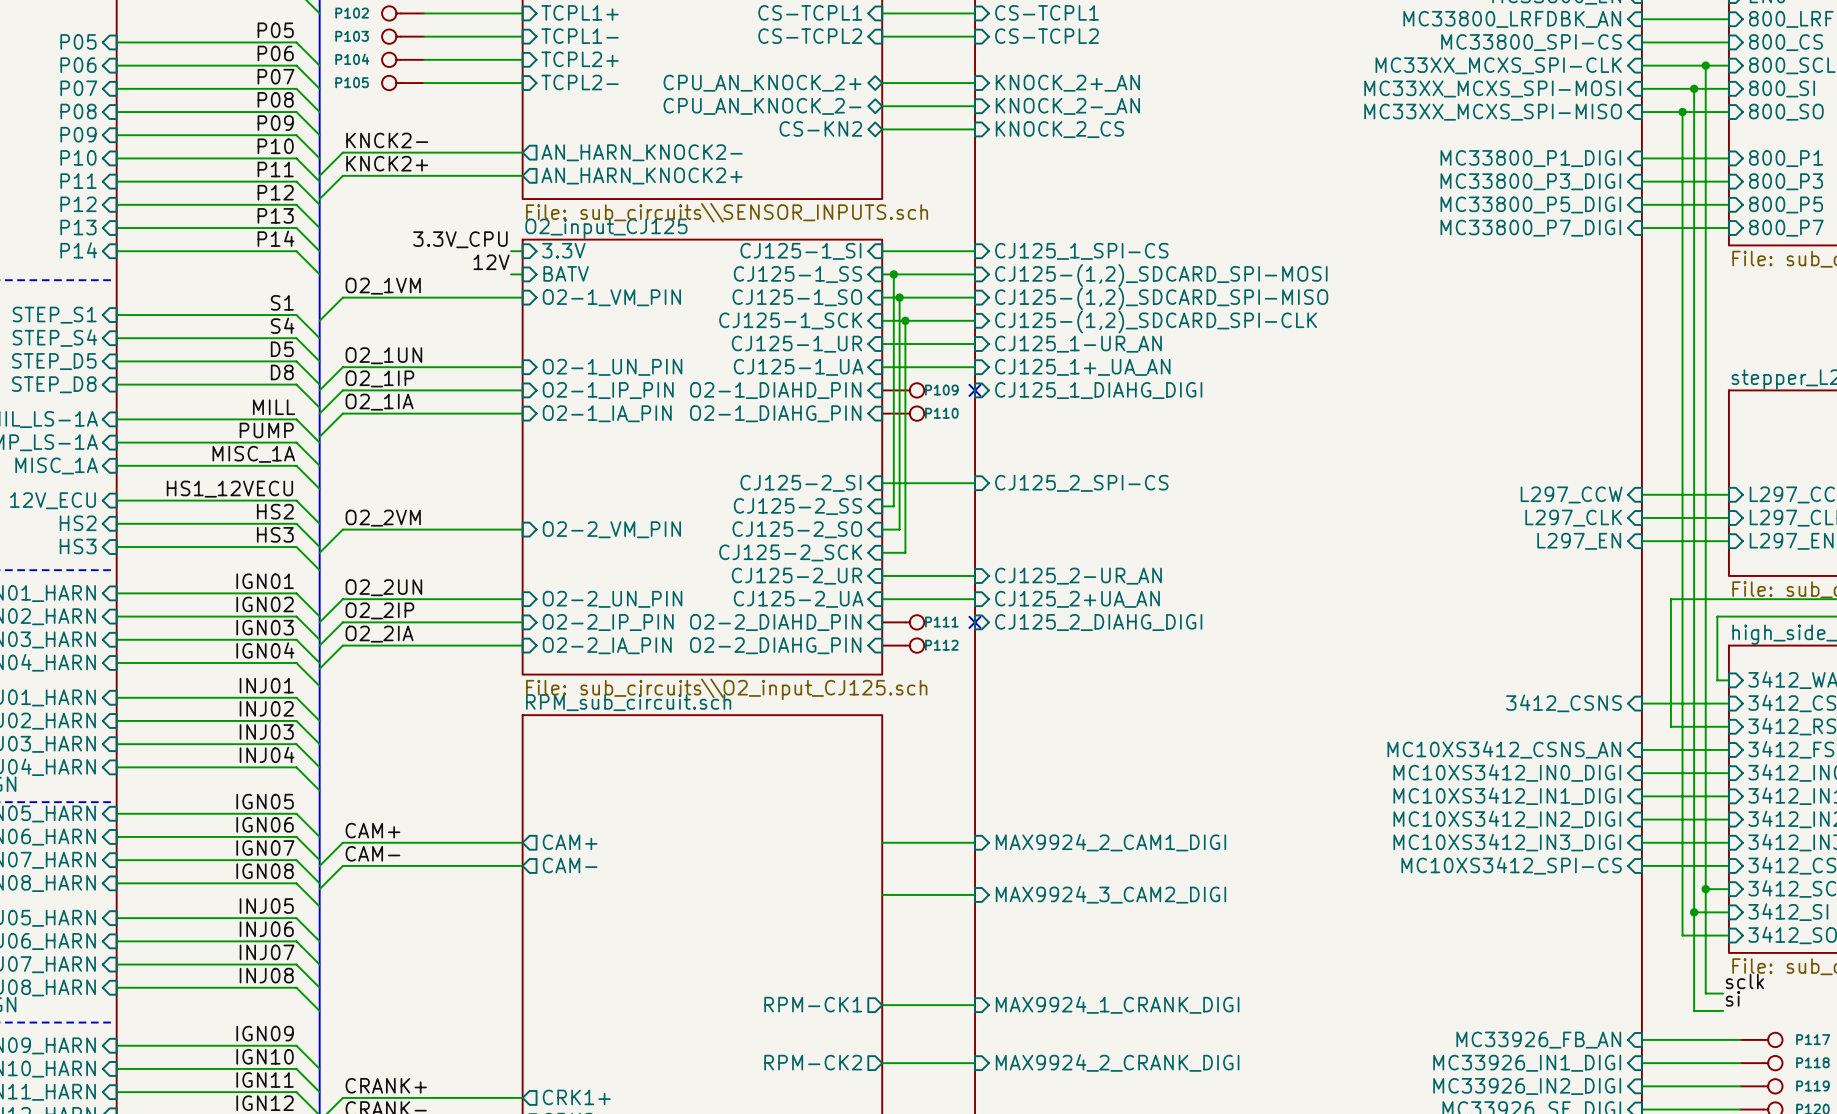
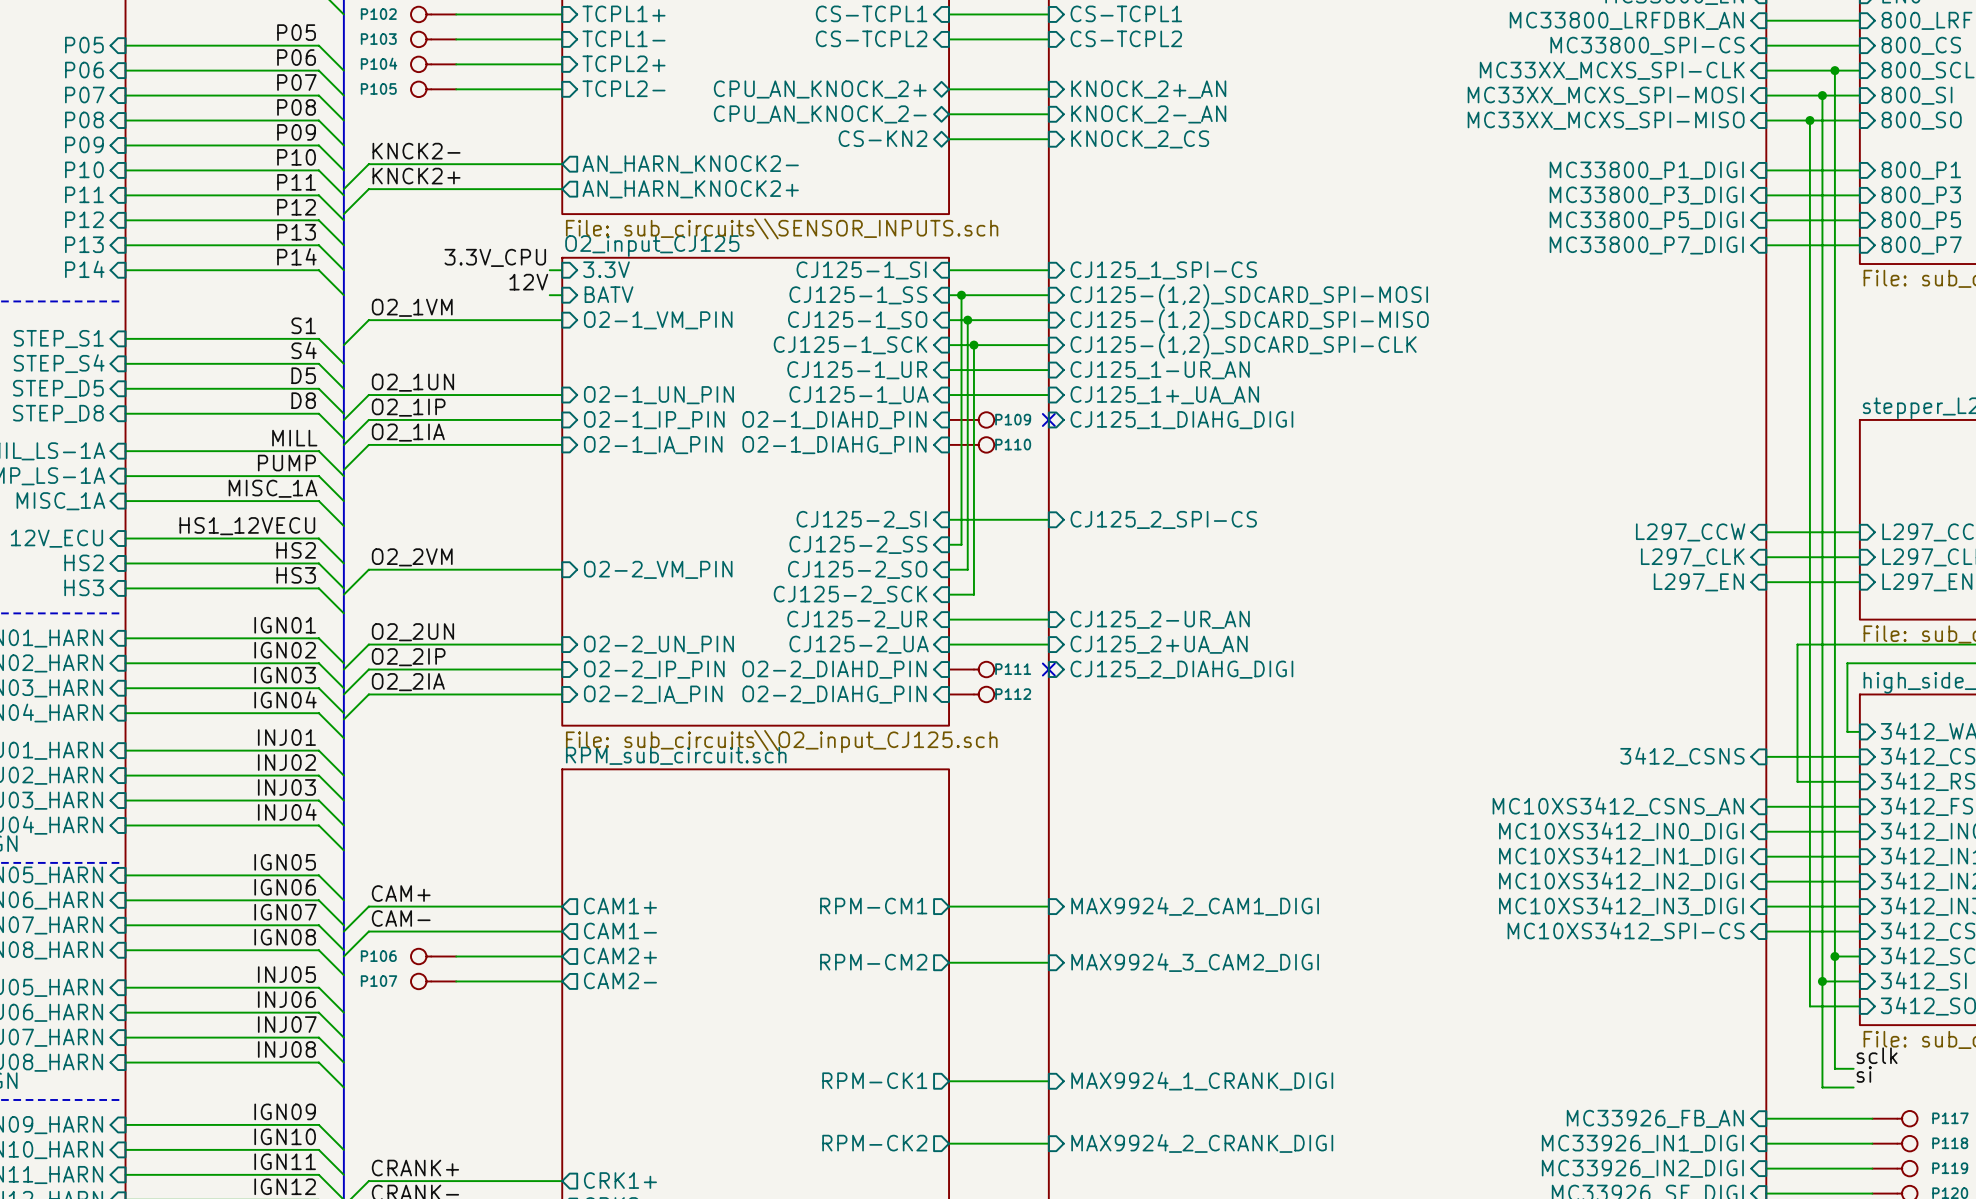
sheet pin: CAM+ (570, 842) -> CAM1+ (620, 906)
sheet pin: none -> RPM-CM1 (873, 906)
sheet pin: CAM- (570, 865) -> CAM1- (620, 930)
sheet pin: none -> CAM2+ (620, 955)
P106: none -> (433, 956)
wire: none -> (456, 956) (562, 956)
sheet pin: none -> RPM-CM2 (873, 962)
sheet pin: none -> CAM2- (620, 980)
P107: none -> (433, 981)
wire: none -> (456, 981) (562, 981)

